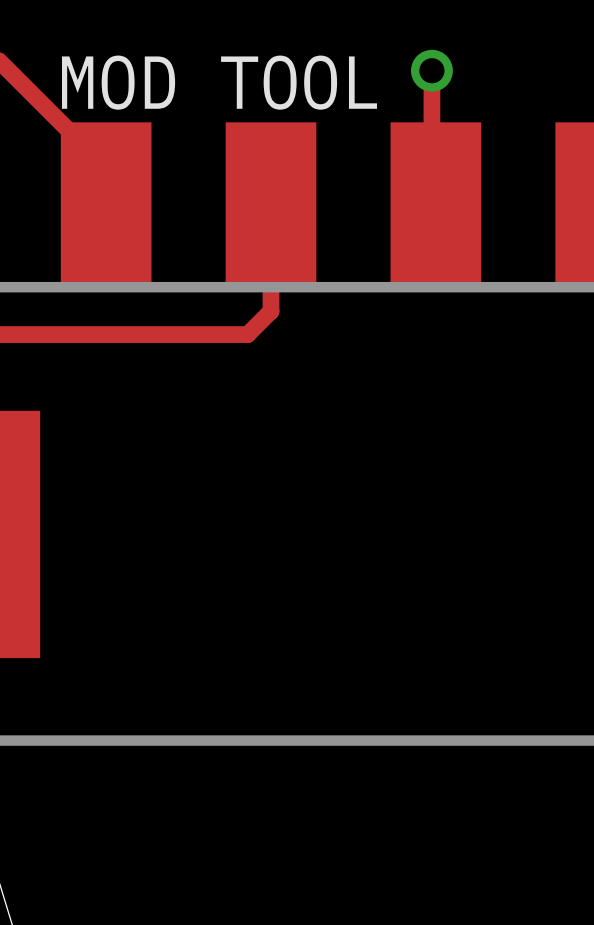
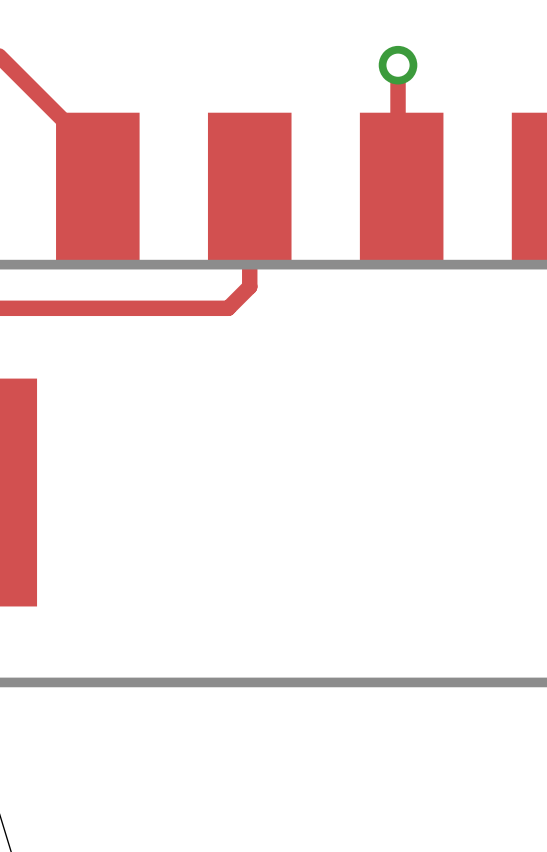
text: MOD TOOL (219, 82) -> none

